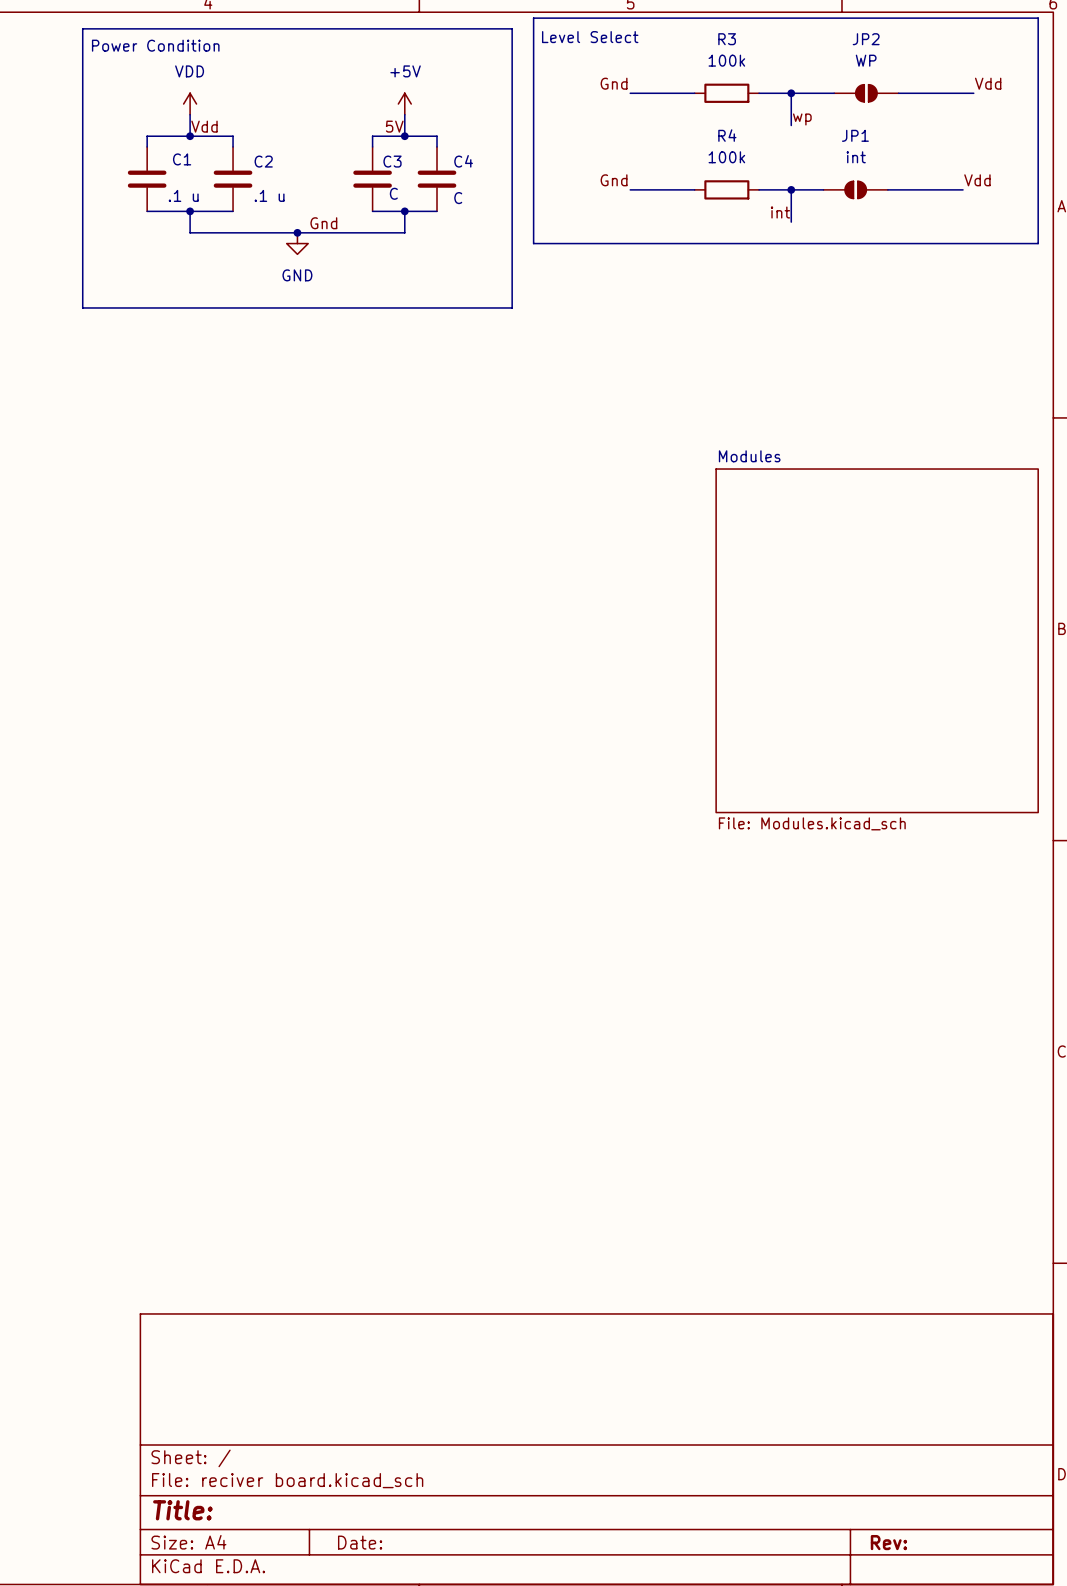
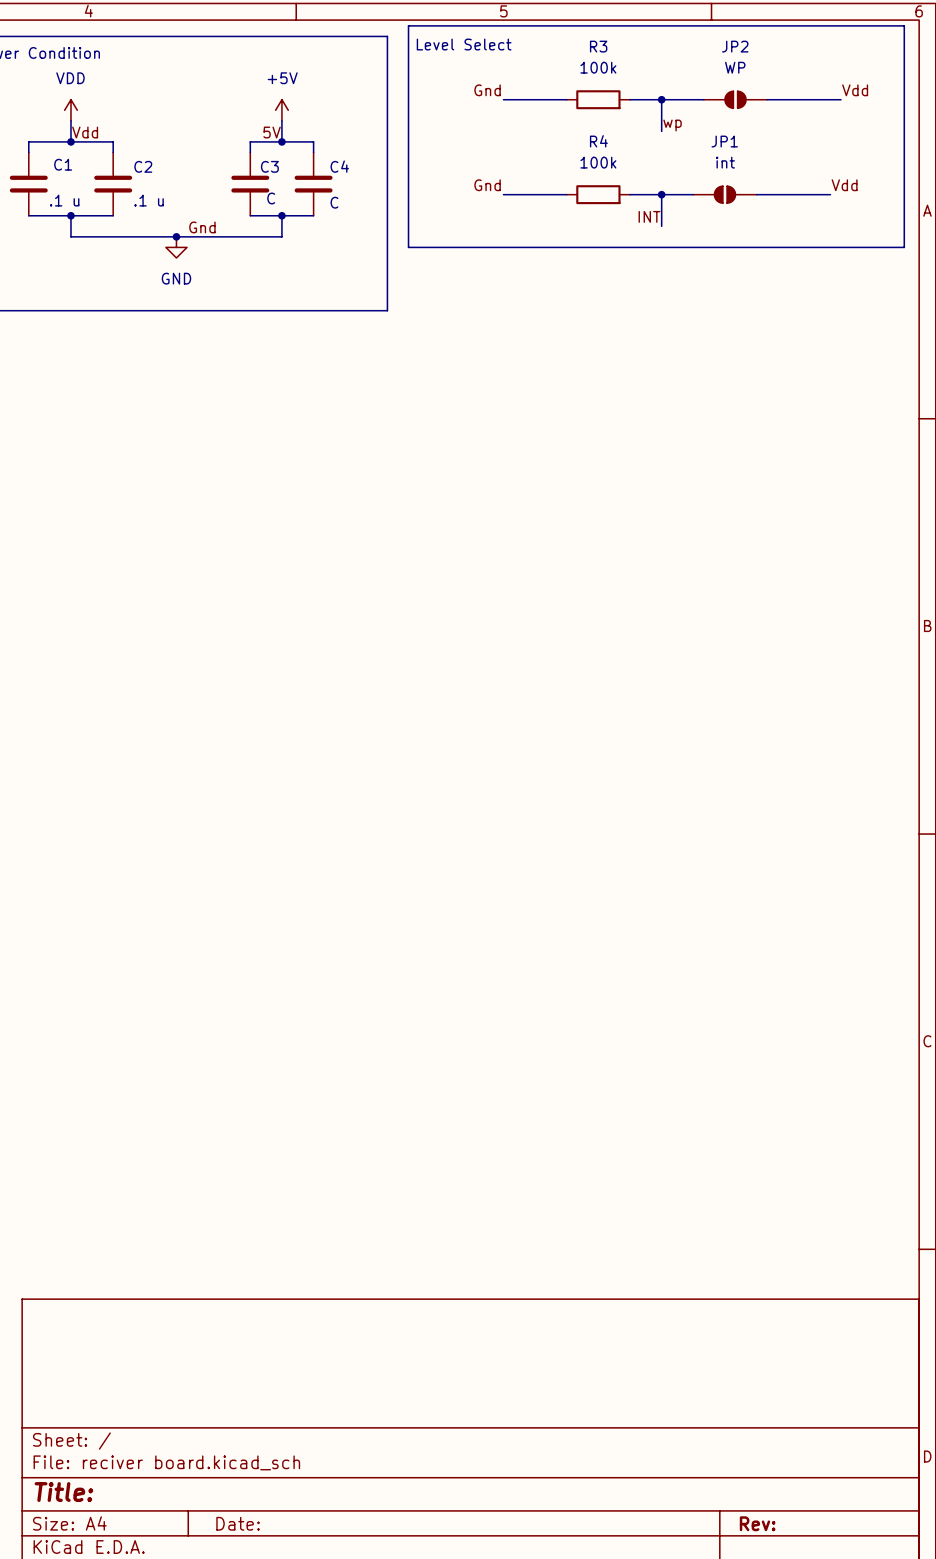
label: int (780, 212) -> INT (649, 216)
sheet Modules: File: Modules.kicad_sch (877, 640) -> none

